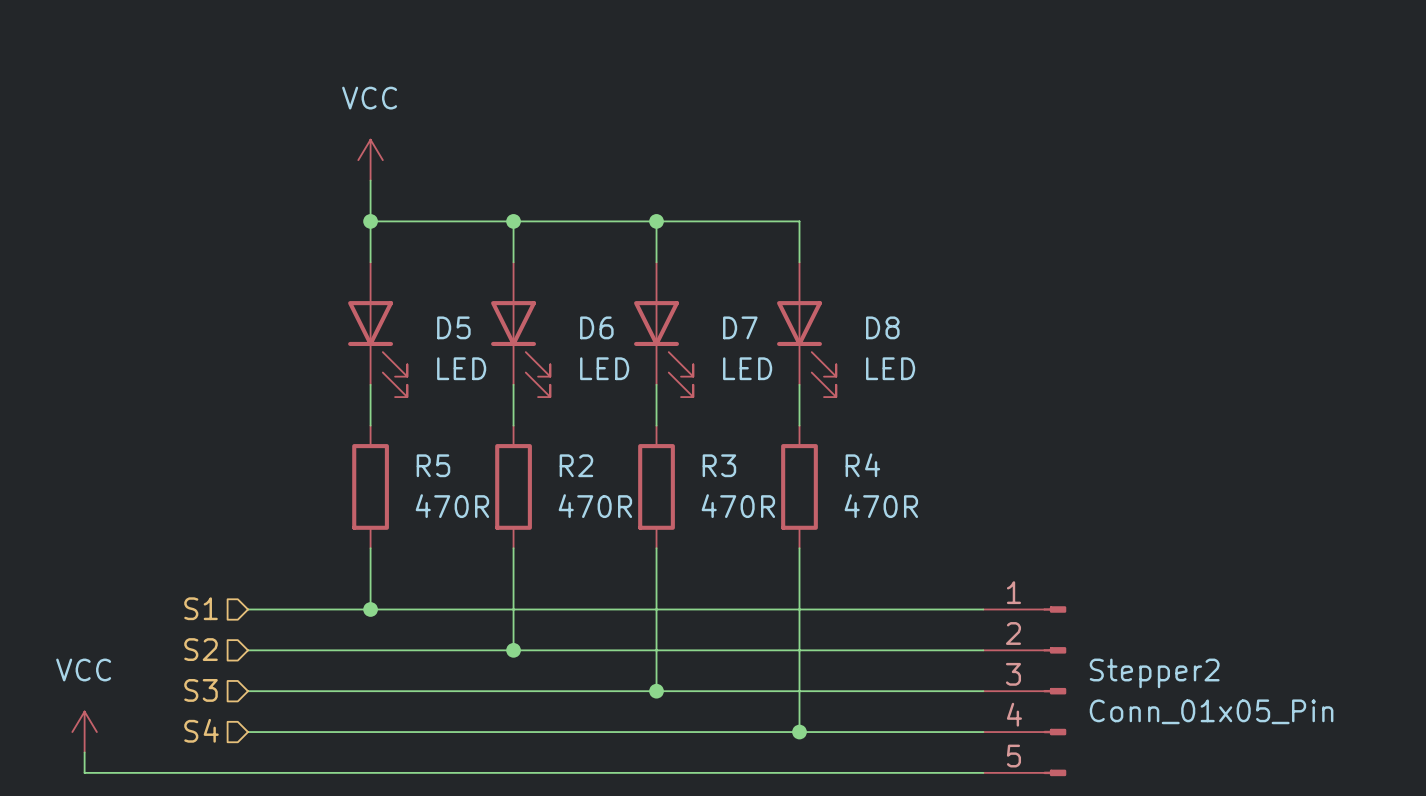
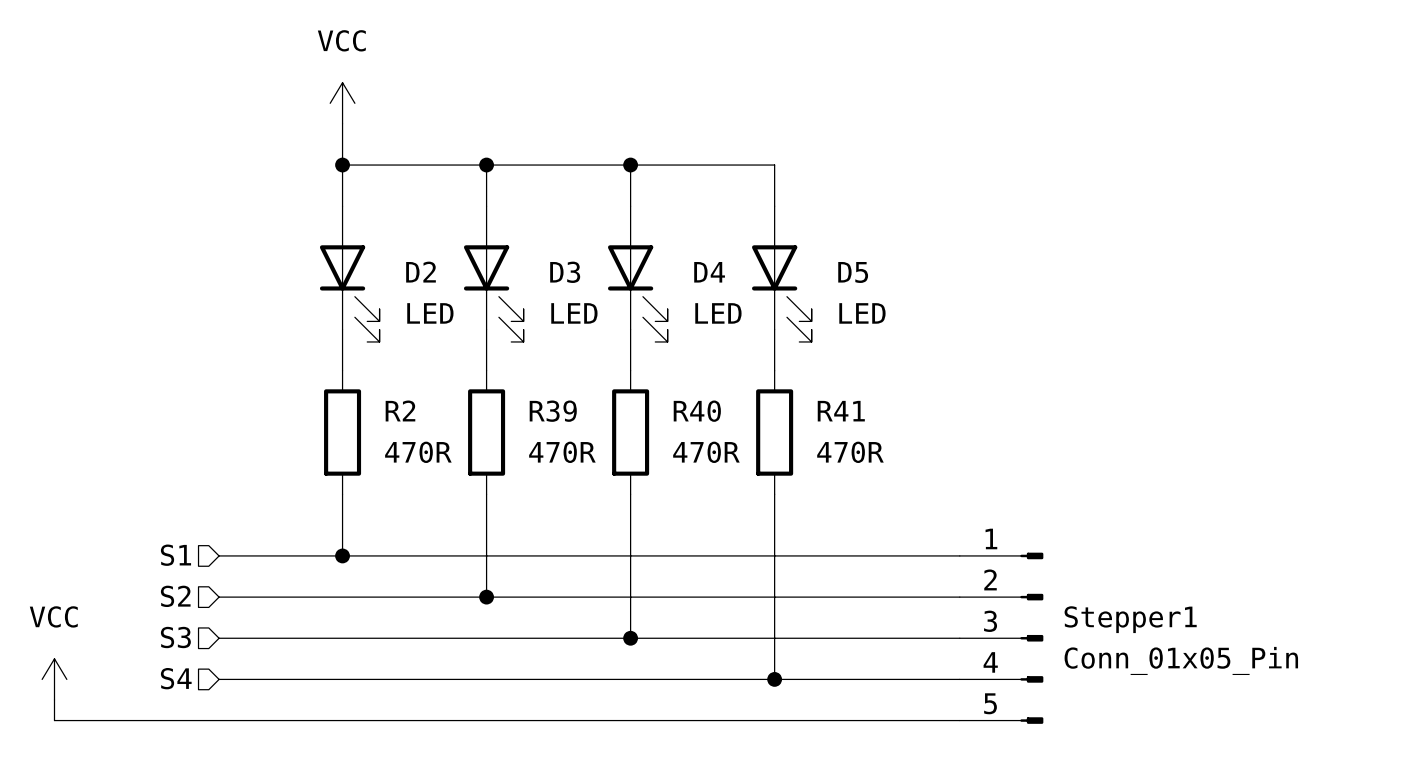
D5 name: D5 (453, 327) -> D2 (421, 272)
D6 name: D6 (596, 327) -> D3 (565, 272)
D7 name: D7 (740, 327) -> D4 (709, 272)
D8 name: D8 (882, 327) -> D5 (853, 272)
R5 name: R5 (433, 465) -> R2 (400, 410)
R2 name: R2 (576, 465) -> R39 (553, 411)
R3 name: R3 (719, 465) -> R40 (697, 411)
R4 name: R4 (862, 465) -> R41 (841, 411)
Stepper2 name: Stepper2 (1154, 673) -> Stepper1 (1130, 619)

